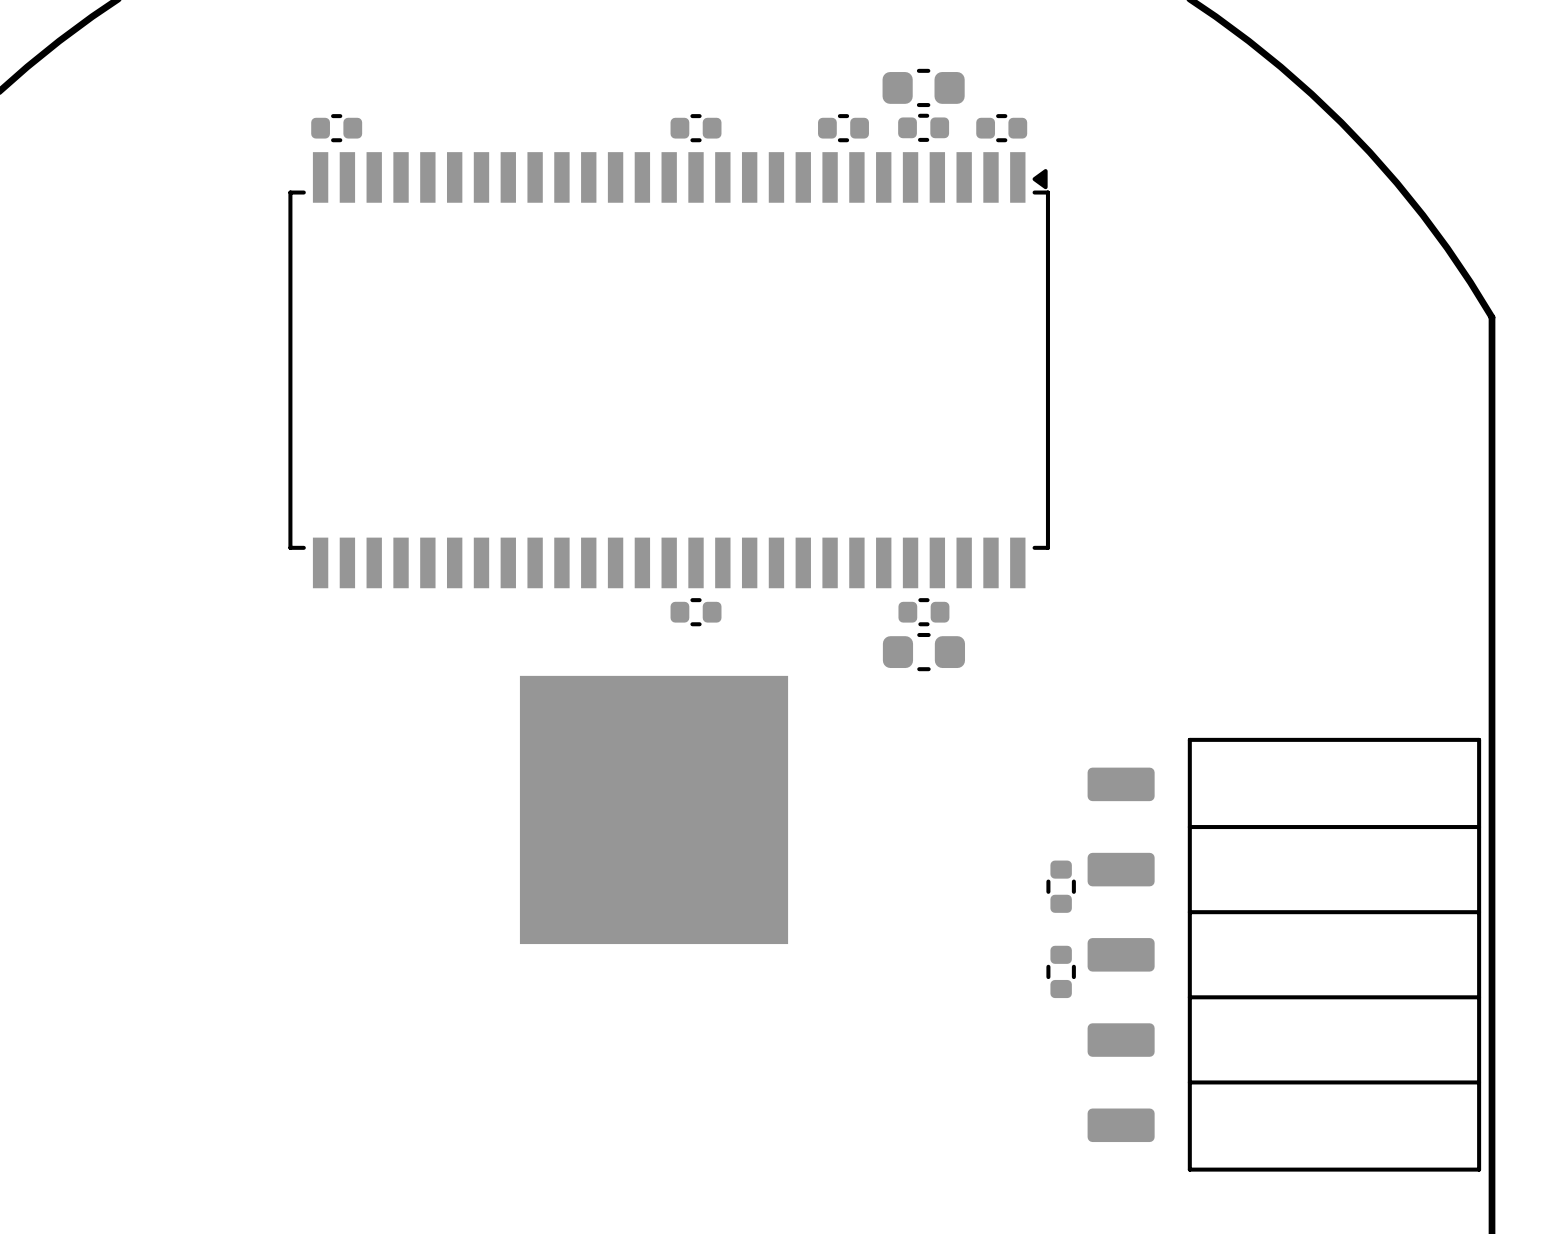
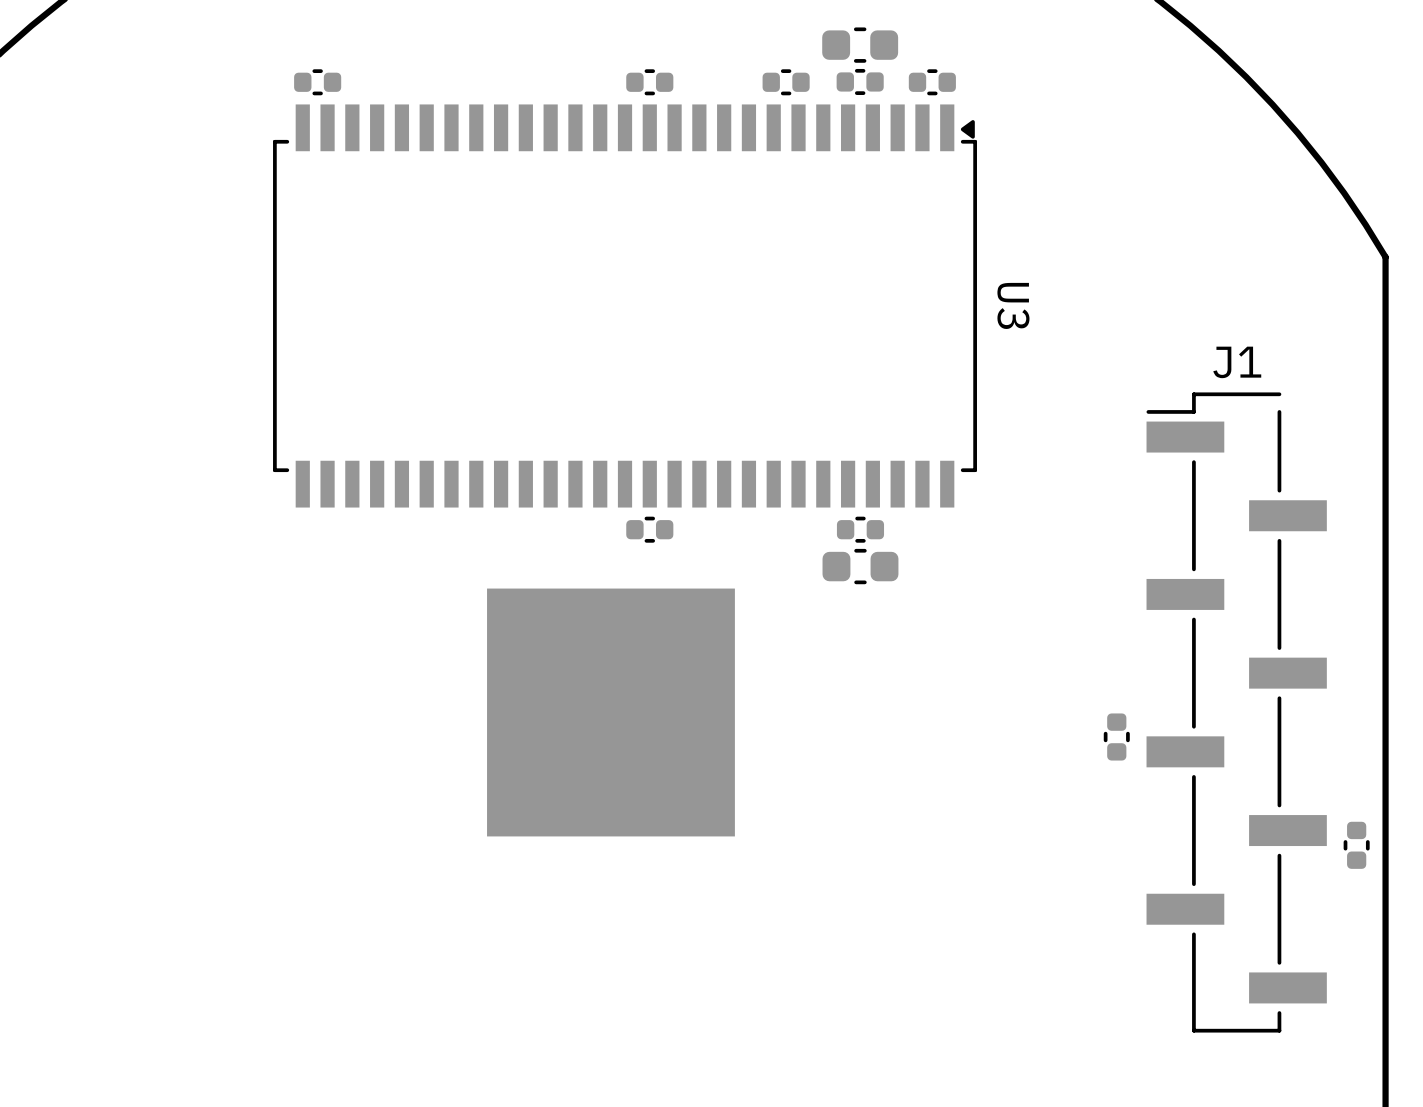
U3 name: none -> U3 (1013, 305)
J1: none -> (1236, 712)
part: none -> (1116, 737)
part: (1061, 886) -> none
part: none -> (1356, 845)
part: (1284, 954) -> none
part: (1061, 971) -> none

